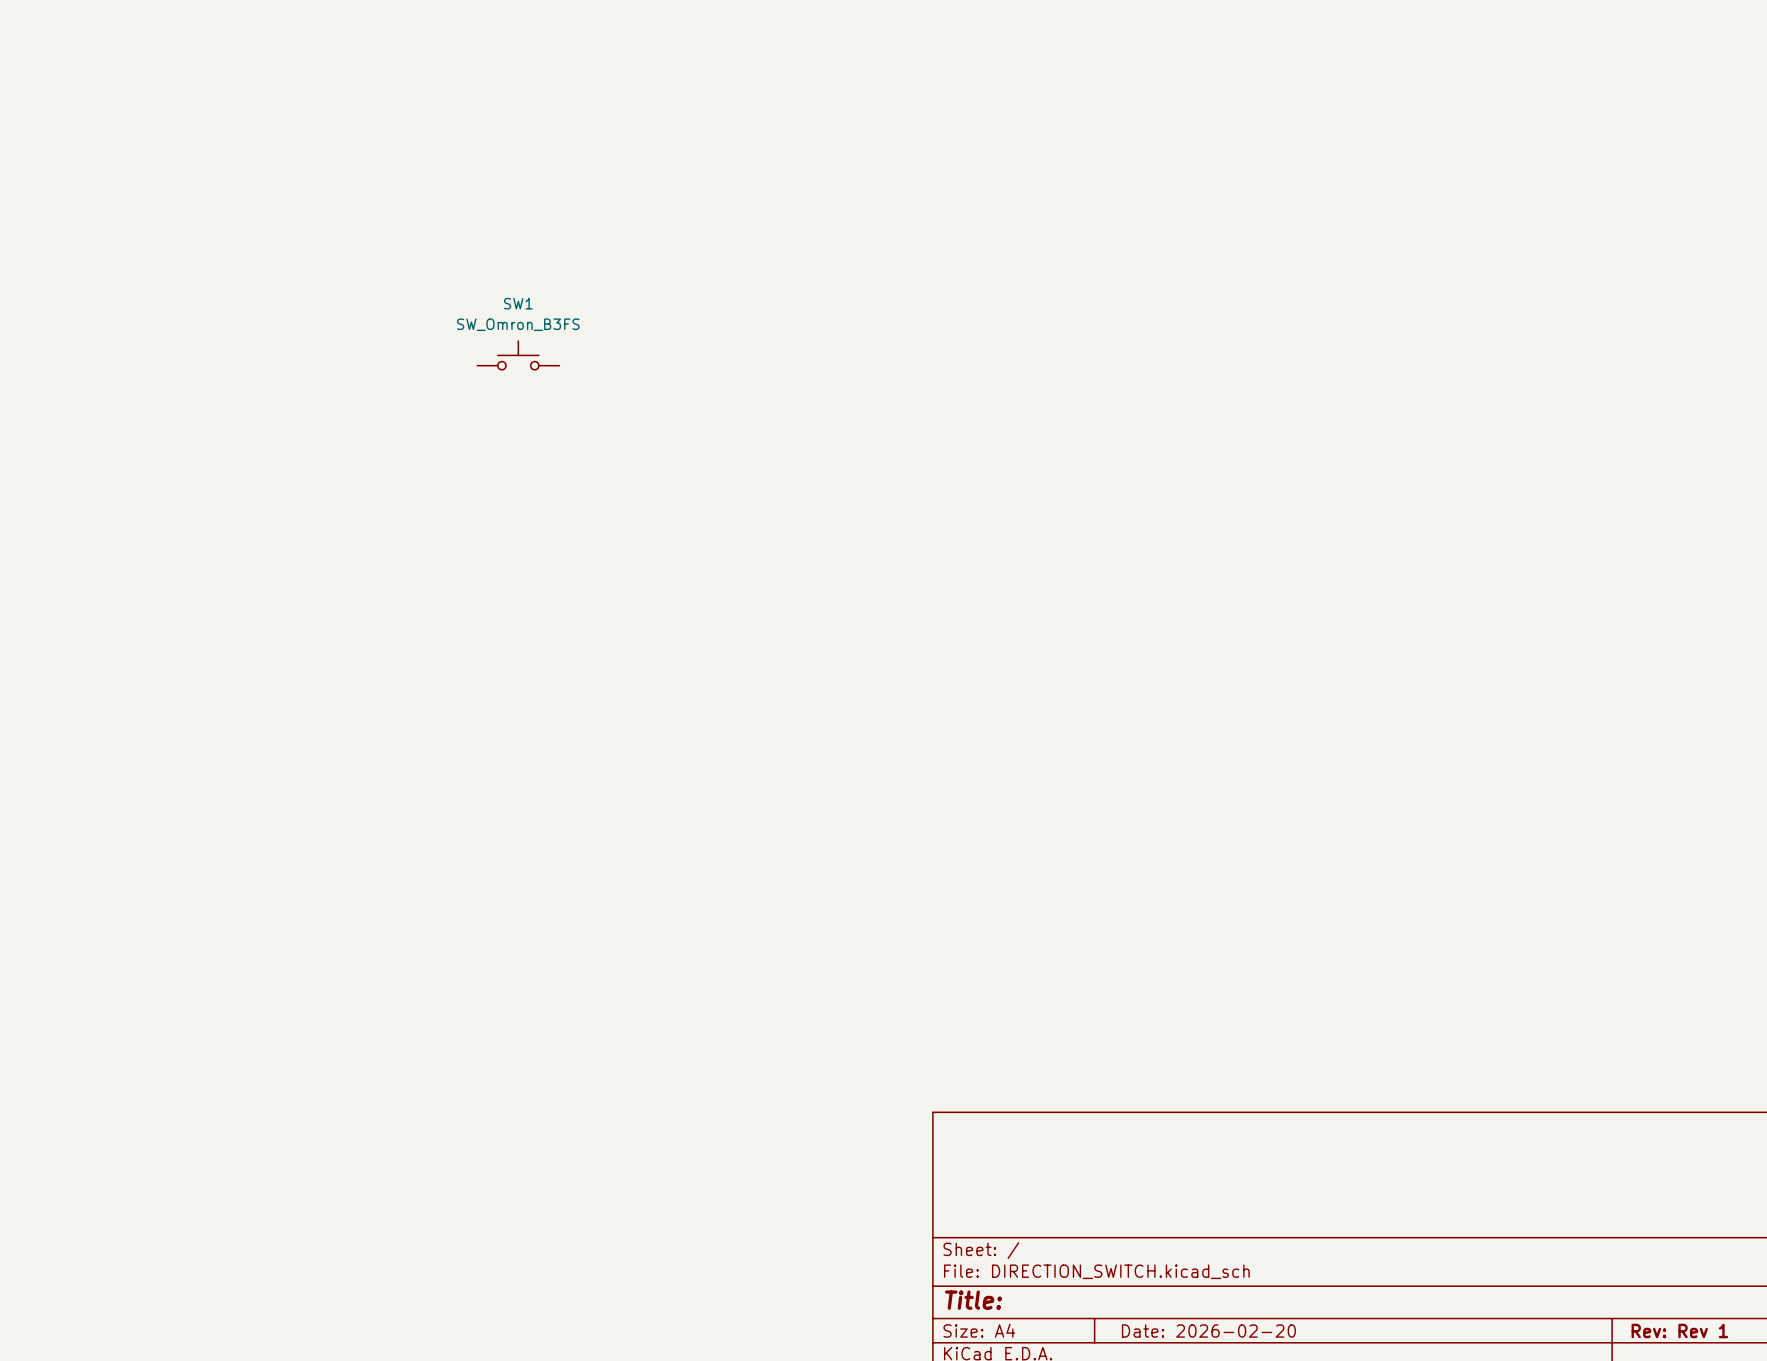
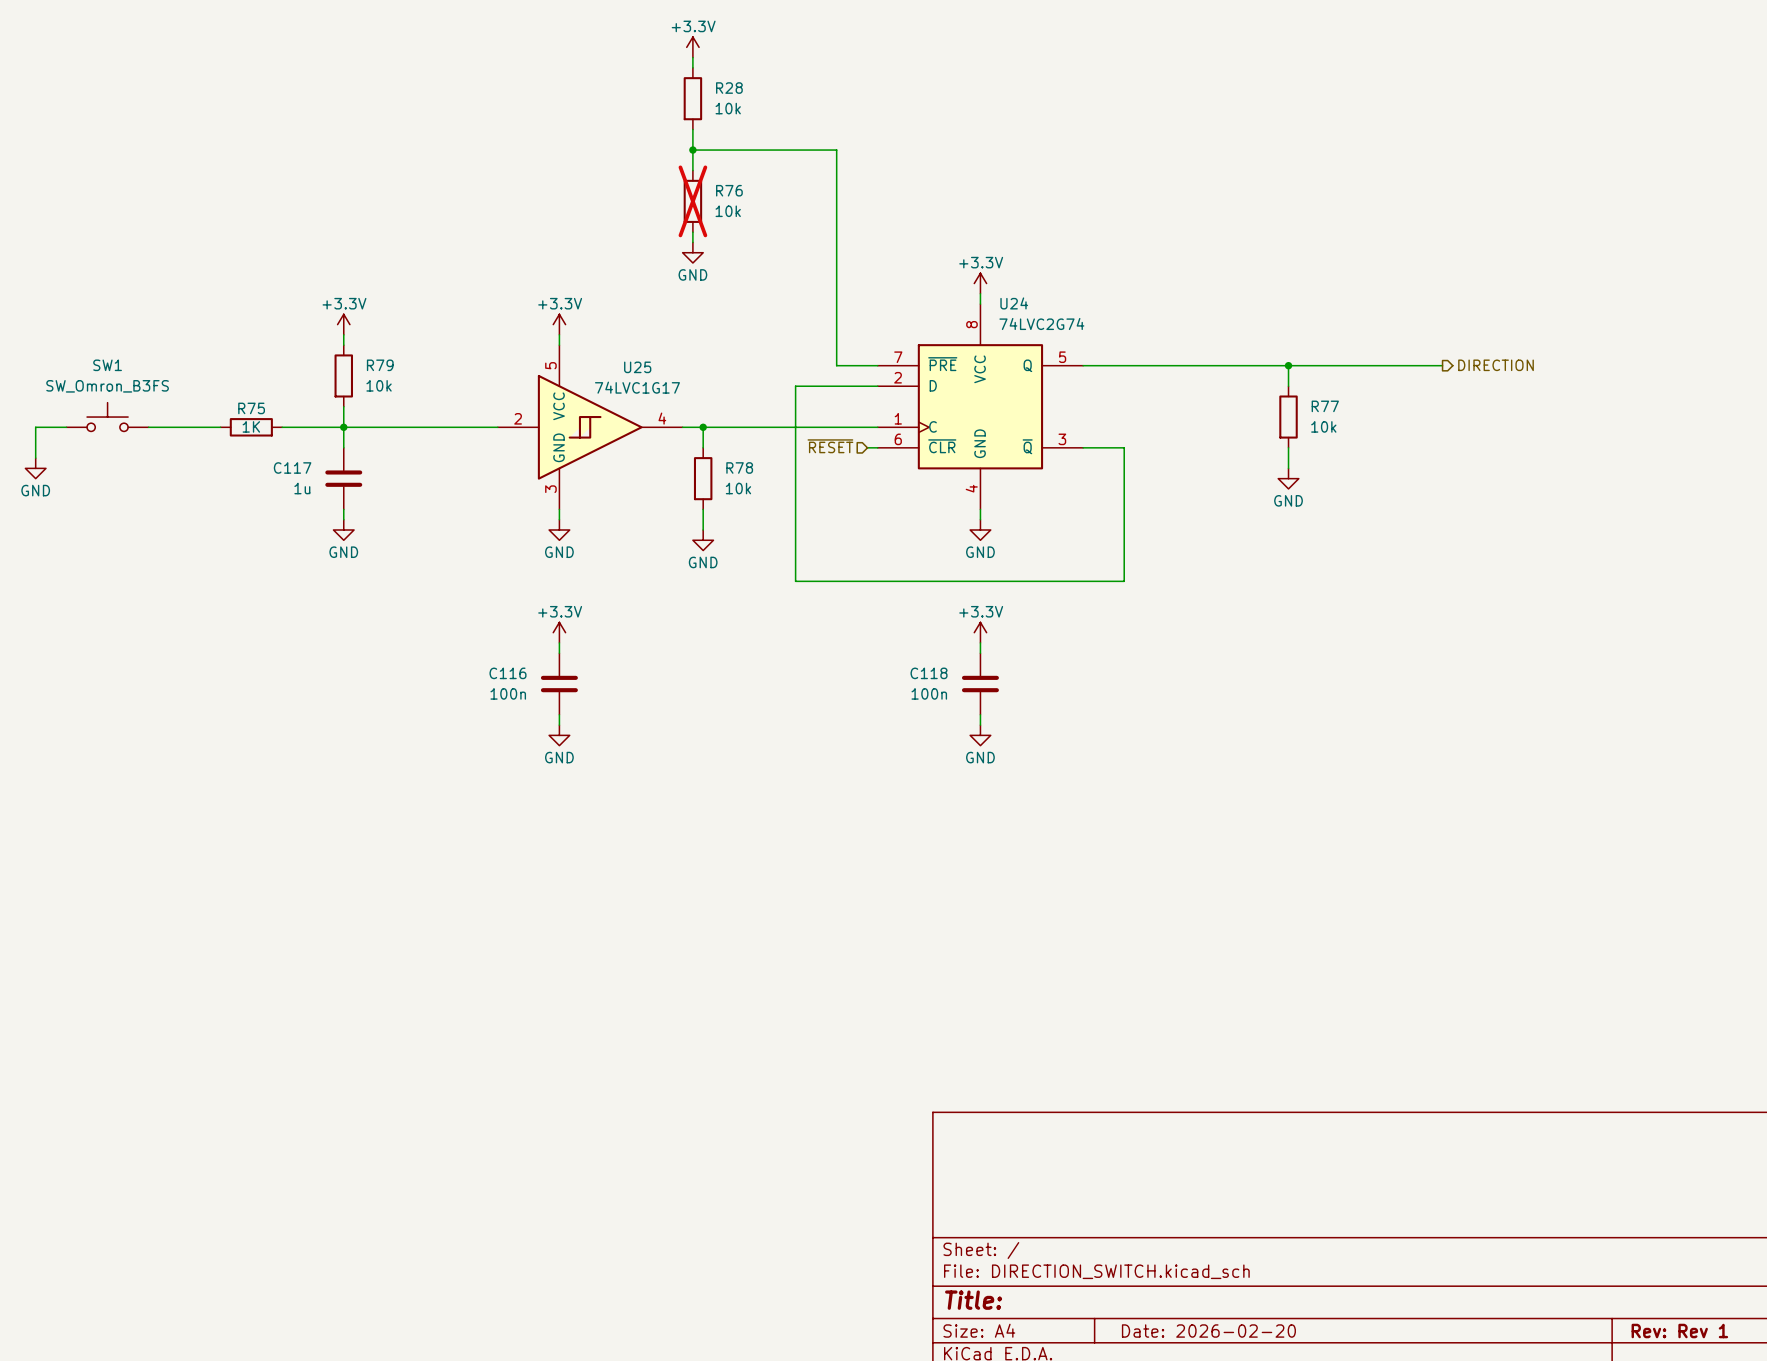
power symbol: none -> +3.3V (692, 47)
wire: none -> (692, 57) (692, 67)
R28: none -> 10k (692, 98)
wire: none -> (692, 129) (692, 170)
wire: none -> (692, 150) (836, 150) (836, 365) (877, 365)
junction: none -> (692, 150)
R76: none -> 10k (692, 201)
wire: none -> (692, 232) (692, 242)
power symbol: none -> GND (692, 252)
power symbol: none -> +3.3V (980, 283)
wire: none -> (980, 293) (980, 304)
power symbol: none -> +3.3V (343, 324)
power symbol: none -> +3.3V (559, 324)
wire: none -> (343, 334) (343, 345)
wire: none -> (559, 334) (559, 345)
SW1 position: (518, 355) -> (107, 417)
wire: none -> (1083, 365) (1442, 365)
wire: none -> (1288, 365) (1288, 386)
junction: none -> (1288, 365)
hierarchical label: none -> DIRECTION (1496, 365)
R79: none -> 10k (343, 375)
wire: none -> (877, 386) (795, 386) (795, 581) (1124, 581) (1124, 447) (1083, 447)
wire: none -> (343, 406) (343, 447)
U24: none -> 74LVC2G74 (980, 406)
R77: none -> 10k (1288, 417)
wire: none -> (66, 427) (35, 427) (35, 458)
wire: none -> (148, 427) (220, 427)
R75: none -> 1K (251, 427)
wire: none -> (282, 427) (497, 427)
junction: none -> (343, 427)
U25: none -> 74LVC1G17 (590, 427)
wire: none -> (682, 427) (877, 427)
wire: none -> (703, 427) (703, 447)
junction: none -> (703, 427)
hierarchical label: none -> ~{RESET} (830, 446)
wire: none -> (867, 447) (877, 447)
wire: none -> (1288, 447) (1288, 468)
power symbol: none -> GND (35, 468)
C117: none -> 1u (343, 478)
R78: none -> 10k (703, 478)
power symbol: none -> GND (1288, 478)
wire: none -> (343, 509) (343, 519)
wire: none -> (559, 509) (559, 519)
wire: none -> (703, 509) (703, 529)
wire: none -> (980, 509) (980, 519)
power symbol: none -> GND (343, 529)
power symbol: none -> GND (559, 529)
power symbol: none -> GND (980, 529)
power symbol: none -> GND (703, 540)
power symbol: none -> +3.3V (559, 632)
power symbol: none -> +3.3V (980, 632)
wire: none -> (559, 642) (559, 653)
wire: none -> (980, 642) (980, 653)
C116: none -> 100n (559, 684)
C118: none -> 100n (980, 684)
wire: none -> (559, 714) (559, 725)
wire: none -> (980, 714) (980, 725)
power symbol: none -> GND (559, 735)
power symbol: none -> GND (980, 735)

